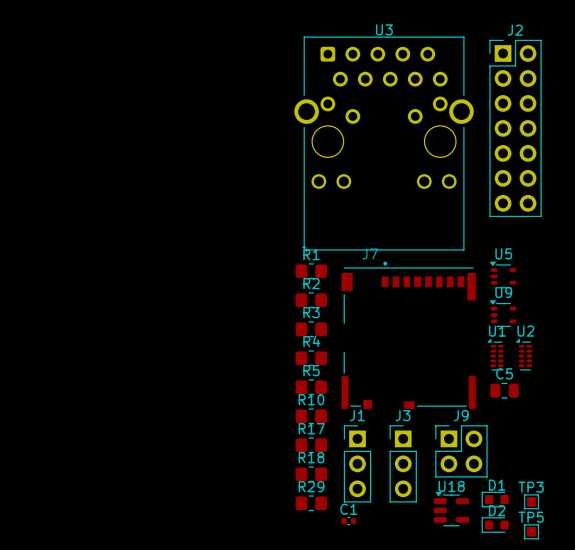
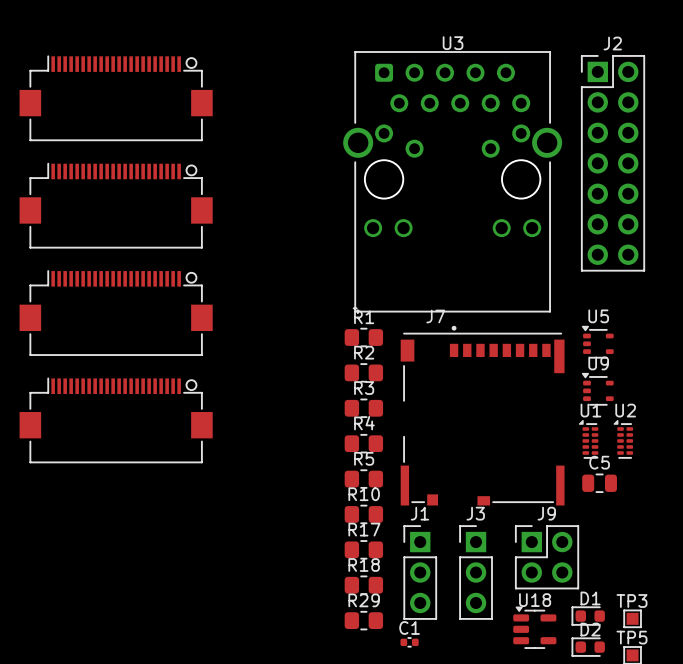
part: none -> (116, 98)
part: none -> (116, 205)
part: none -> (116, 313)
part: none -> (116, 420)

